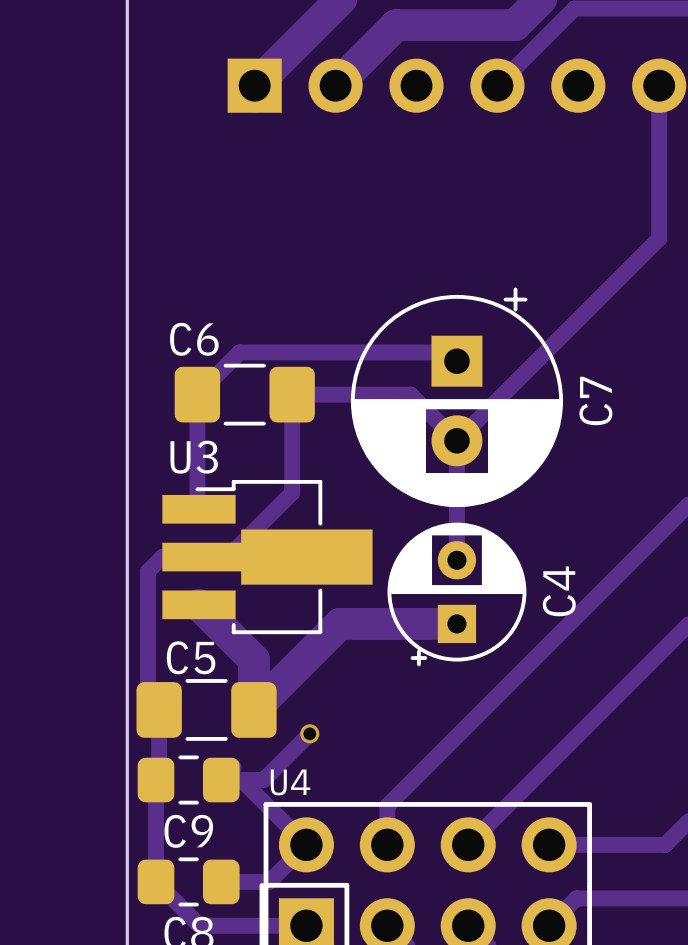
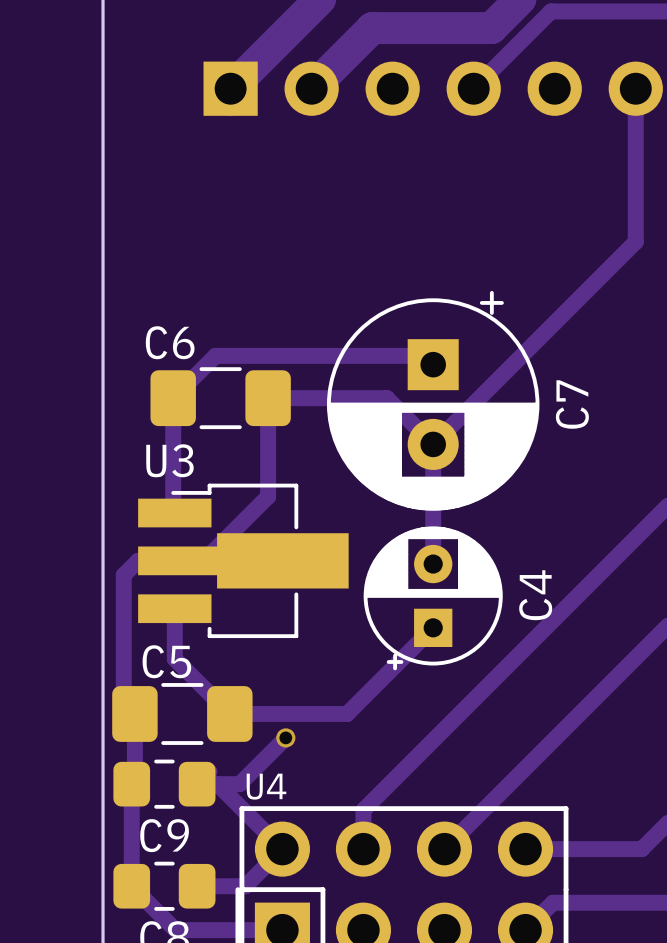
track: (198, 604) (253, 659) (253, 709) (339, 623) (456, 623) -> (174, 608) (174, 658) (229, 713) (347, 713) (433, 627)

